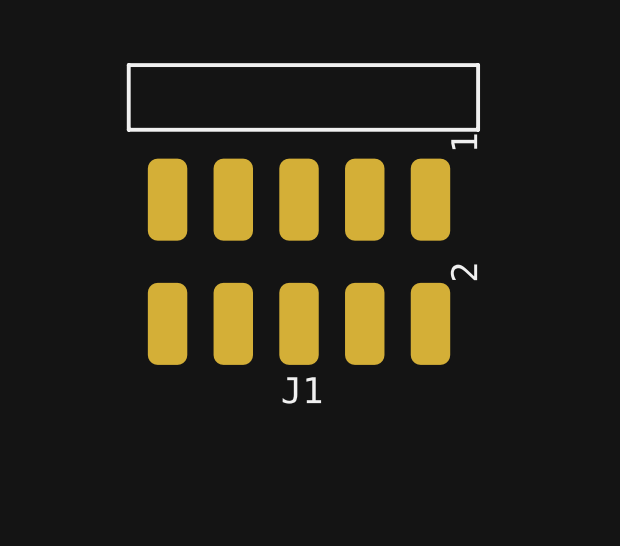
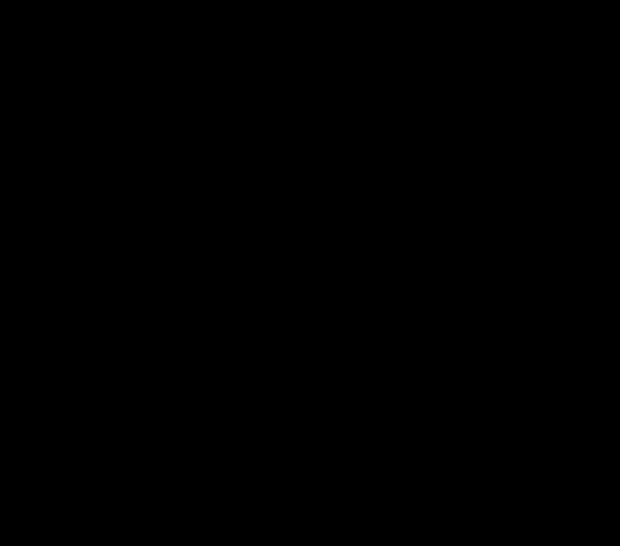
J1: (303, 214) -> none

